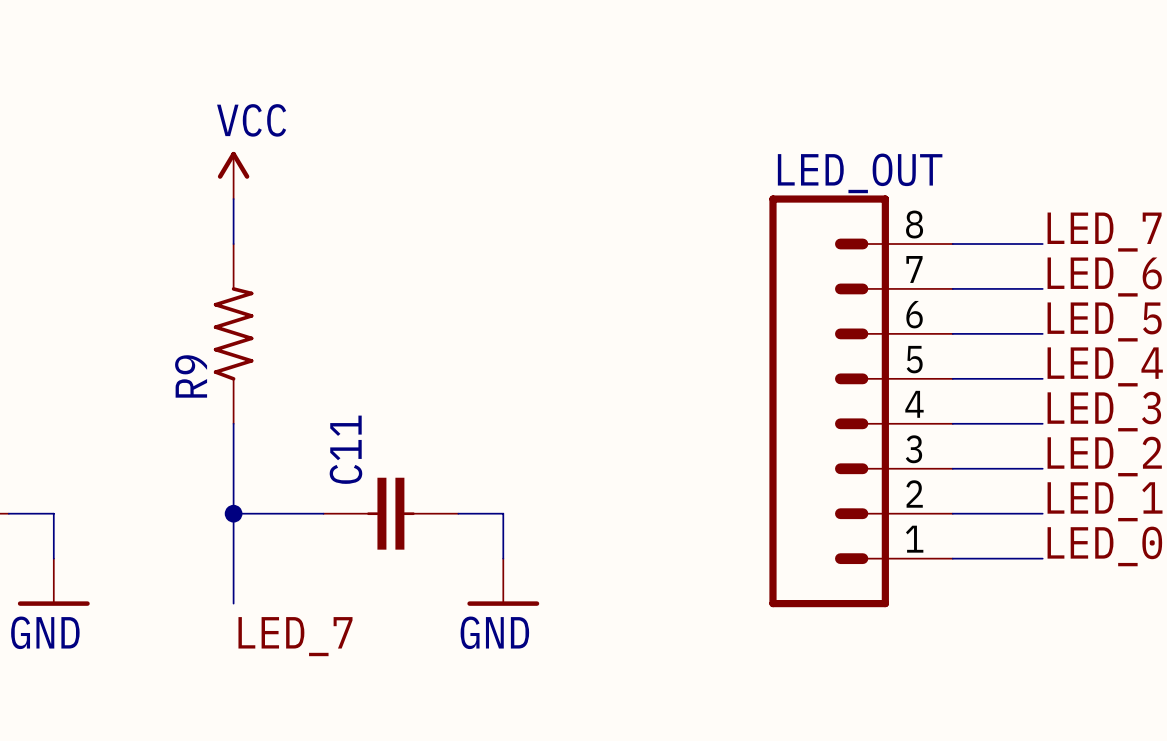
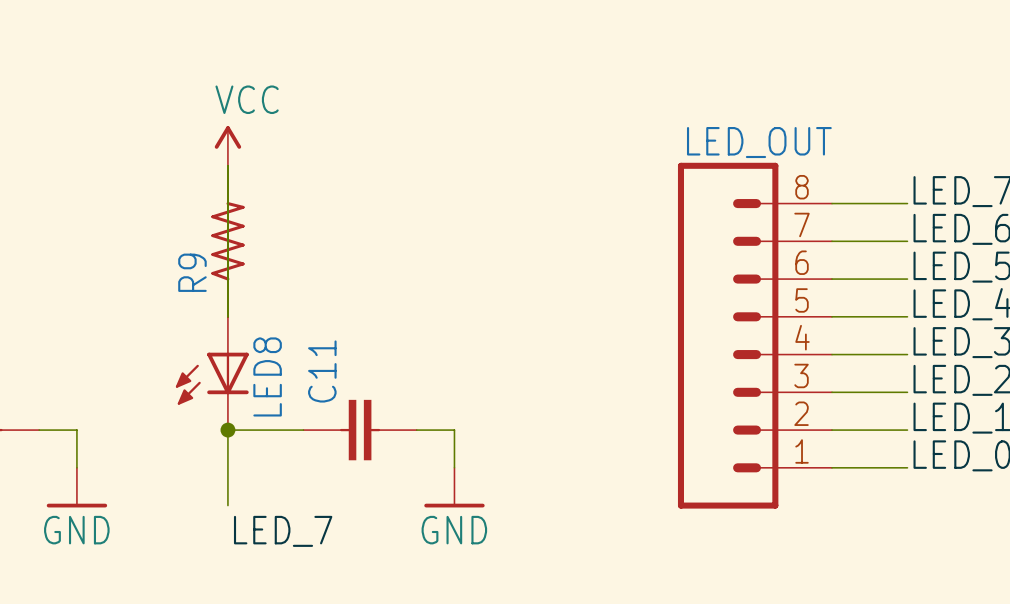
R9 position: (233, 333) -> (227, 241)
LED8: none -> (212, 373)

